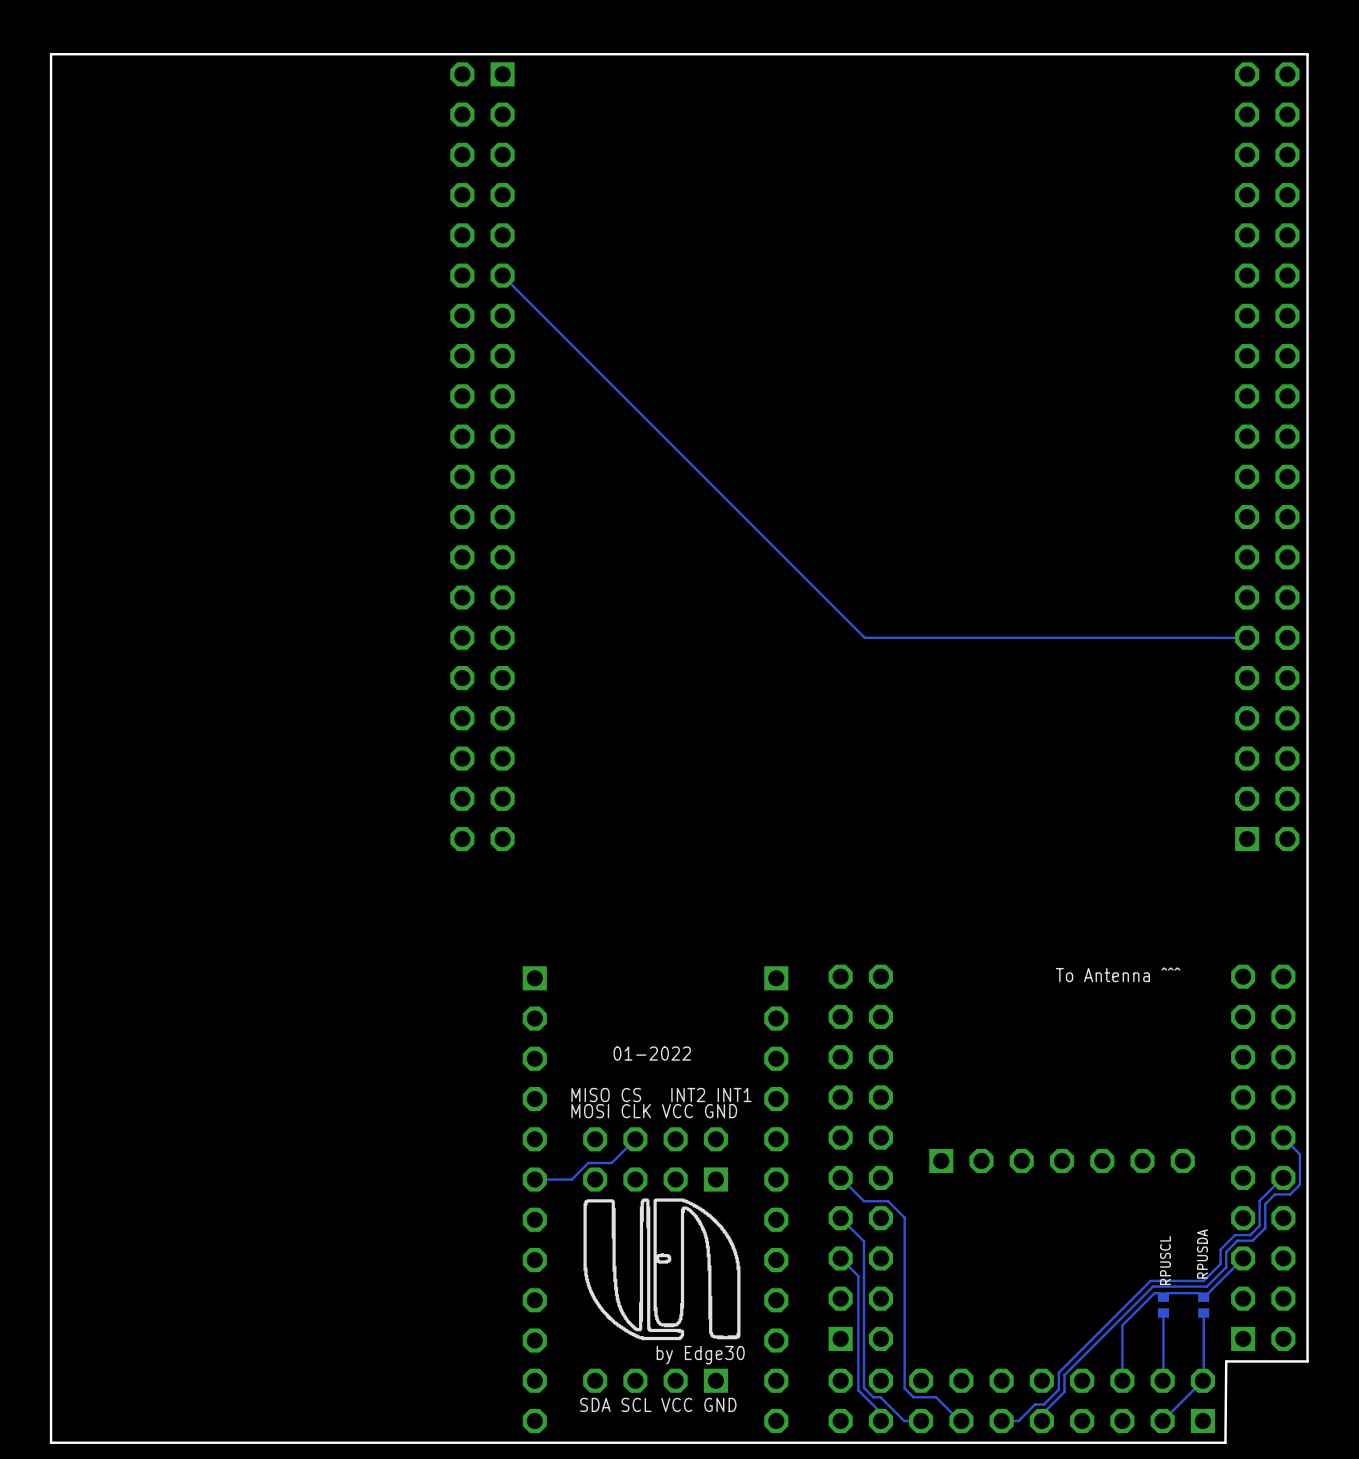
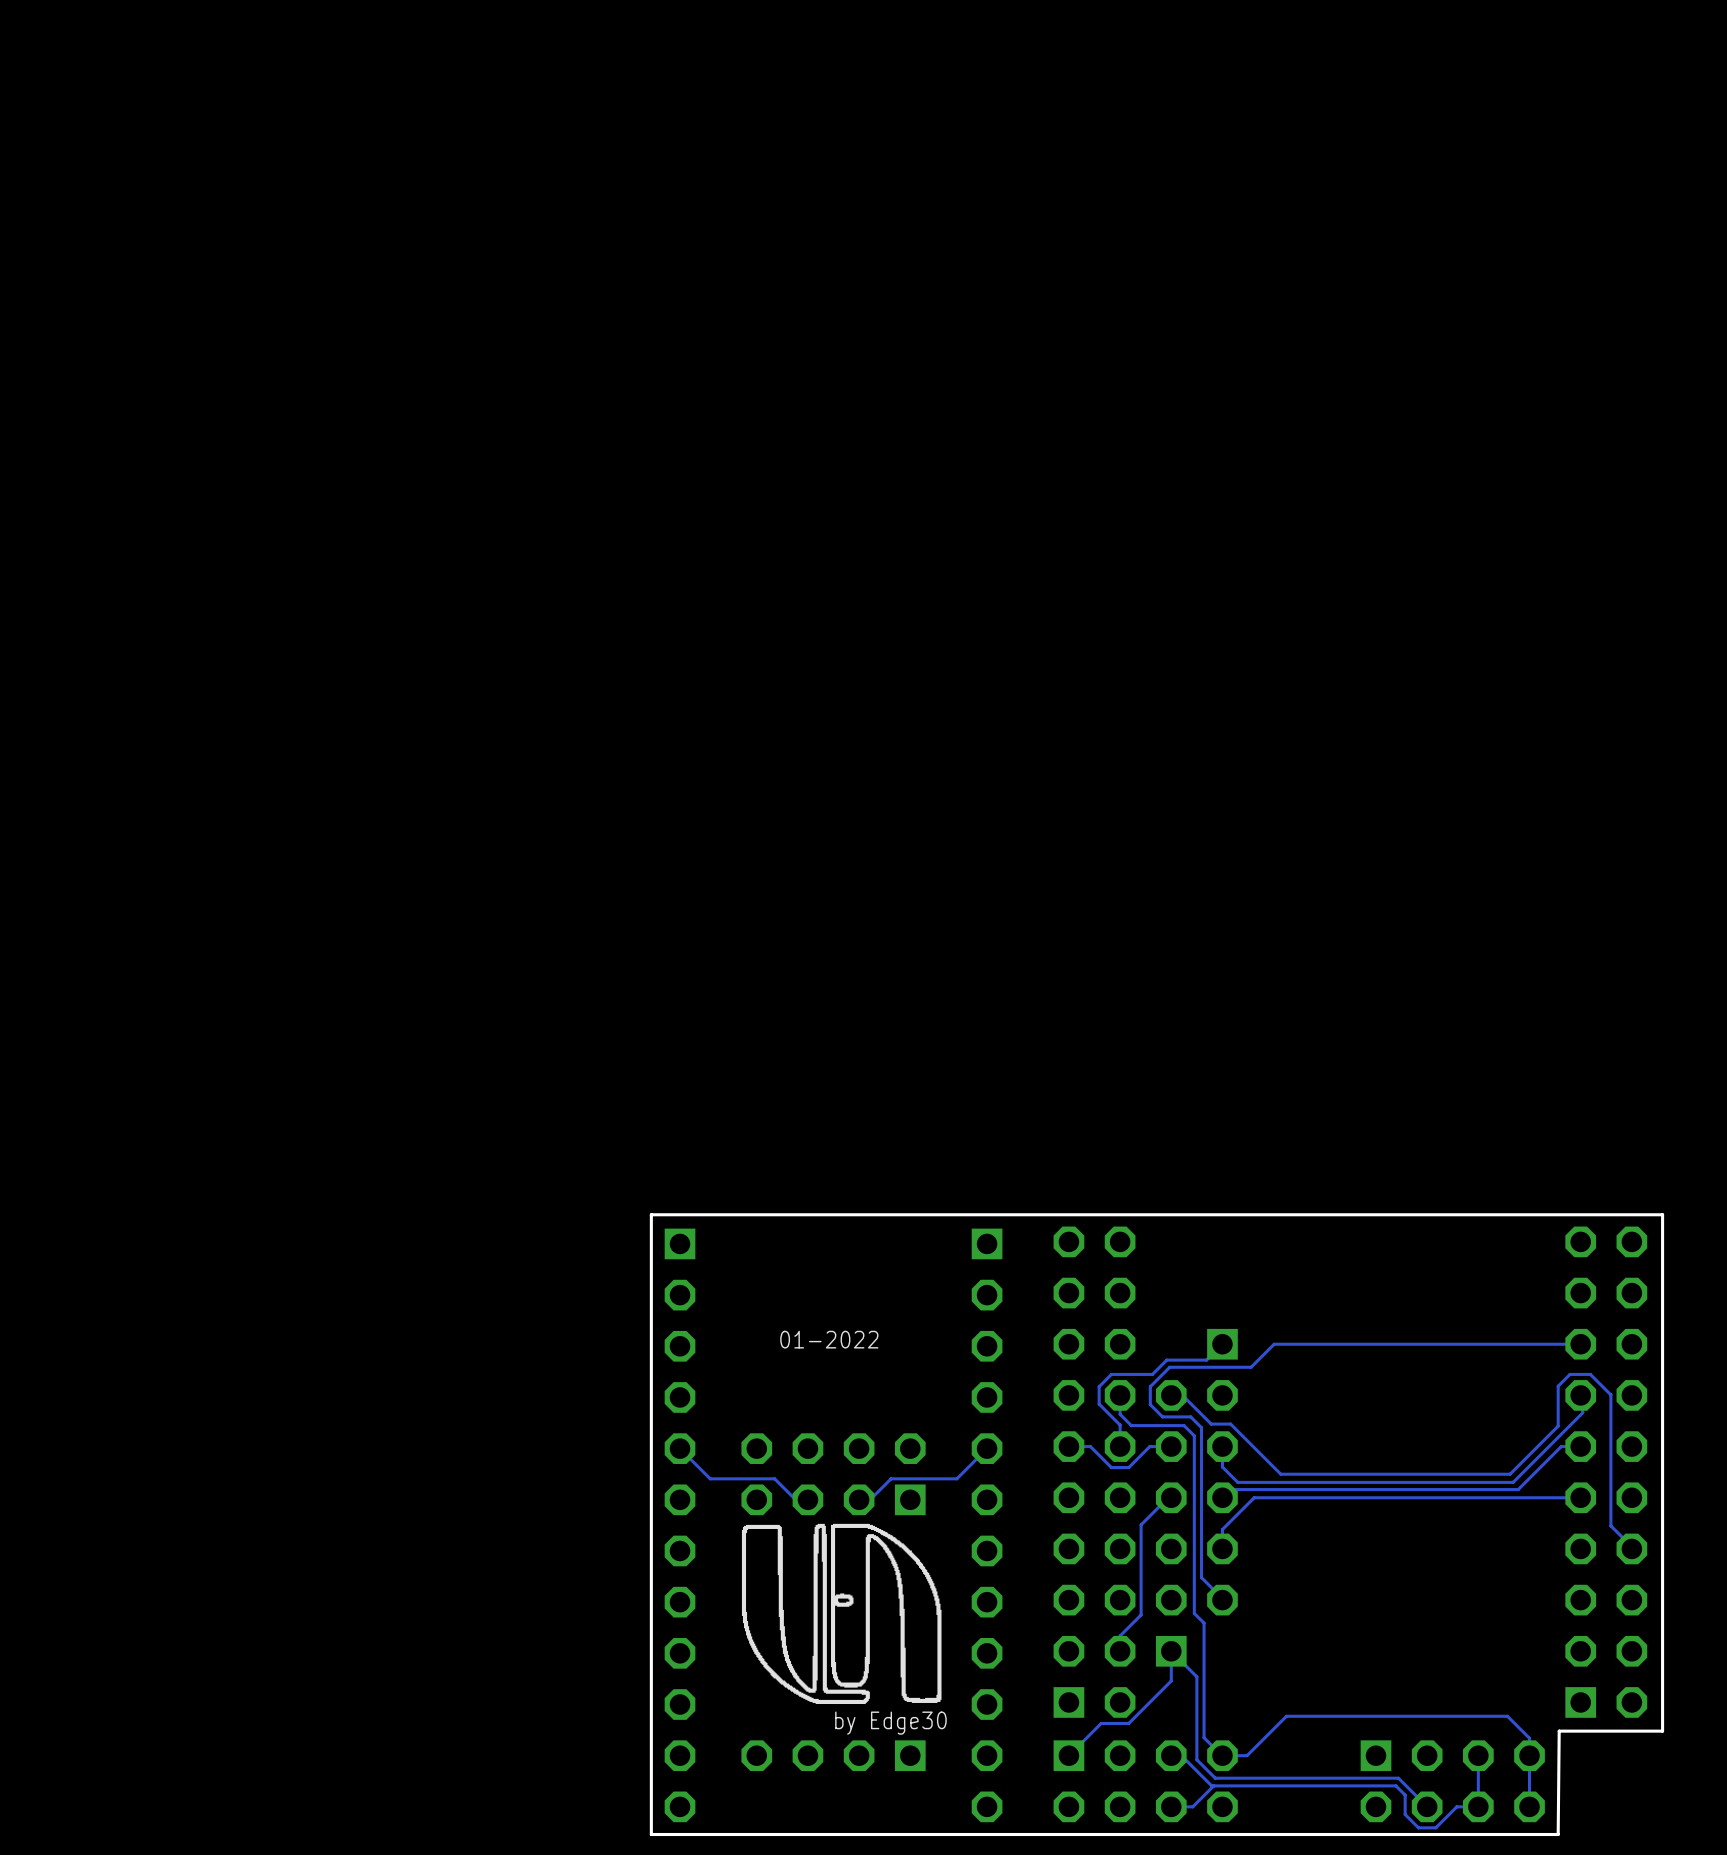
track: (502, 275) (864, 637) (1247, 637) -> none
part: (482, 456) -> none
part: (1267, 456) -> none
board edge: (1307, 955) (1307, 54) (51, 54) (51, 1442) (512, 1442) -> (1662, 1214) (651, 1214) (651, 1834)
text: To Antenna ^^^ (1118, 974) -> none
track: none -> (1222, 1344) (1206, 1360) (1166, 1360) (1152, 1374) (1111, 1374) (1099, 1386) (1099, 1404) (1120, 1425) (1120, 1446)
track: none -> (1580, 1344) (1274, 1344) (1251, 1367) (1169, 1367) (1150, 1386) (1150, 1404) (1162, 1416) (1190, 1416) (1201, 1427) (1201, 1577) (1222, 1600)
text: MISO CS INT2 INT1 (661, 1095) -> none
track: none -> (1120, 1395) (1120, 1414) (1131, 1425) (1184, 1425) (1194, 1435) (1194, 1613) (1204, 1623) (1204, 1737) (1221, 1755) (1247, 1755) (1286, 1716) (1507, 1716) (1529, 1738) (1529, 1755) (1527, 1755) (1529, 1757) (1529, 1806)
track: none -> (1171, 1395) (1182, 1395) (1211, 1424) (1230, 1424) (1280, 1474) (1510, 1474) (1558, 1426) (1558, 1386) (1569, 1374) (1590, 1374) (1610, 1394) (1610, 1525) (1631, 1548)
track: none -> (1580, 1395) (1582, 1397) (1582, 1412) (1513, 1482) (1237, 1482) (1222, 1467) (1222, 1446)
text: MOSI CLK VCC GND (654, 1111) -> none
track: none -> (1171, 1446) (1149, 1446) (1128, 1467) (1111, 1467) (1090, 1446) (1068, 1446)
track: none -> (1580, 1446) (1561, 1446) (1518, 1489) (1230, 1489) (1222, 1497)
track: (1283, 1137) (1299, 1154) (1299, 1184) (1290, 1194) (1274, 1194) (1265, 1204) (1265, 1228) (1252, 1240) (1237, 1240) (1226, 1251) (1226, 1267) (1206, 1286) (1152, 1286) (1064, 1375) (1064, 1391) (1041, 1414) (1041, 1421) -> none
track: (635, 1139) (611, 1163) (609, 1163) -> (807, 1499) (795, 1499) (774, 1478)
track: none -> (987, 1448) (956, 1478) (891, 1478) (870, 1499) (859, 1499)
part: none -> (1222, 1472)
part: (1062, 1161) -> none
track: (588, 1163) (571, 1179) (534, 1179) -> (748, 1478) (710, 1478) (680, 1448)
track: (840, 1177) (864, 1201) (888, 1201) (904, 1217) (904, 1388) (913, 1397) (936, 1397) (961, 1421) -> none
track: none -> (1171, 1497) (1168, 1497) (1141, 1524) (1141, 1614) (1120, 1635) (1120, 1651)
track: none -> (1580, 1497) (1254, 1497) (1222, 1529) (1222, 1548)
track: (1283, 1177) (1259, 1200) (1259, 1225) (1250, 1235) (1235, 1235) (1220, 1249) (1220, 1264) (1203, 1280) (1150, 1280) (1058, 1372) (1058, 1389) (1043, 1404) -> (1478, 1755) (1478, 1806) (1456, 1806) (1435, 1827) (1418, 1827) (1405, 1814) (1405, 1795) (1395, 1785) (1327, 1785)
part: none -> (1171, 1523)
track: (840, 1218) (864, 1241) (864, 1387) (873, 1397) (880, 1397) (904, 1421) (921, 1421) -> (1213, 1785) (1192, 1806) (1171, 1806)
track: (840, 1258) (858, 1276) (858, 1390) (880, 1412) (880, 1421) -> none
track: (1241, 1258) (1243, 1258) (1204, 1297) (1199, 1293) (1167, 1293) (1163, 1297) (1159, 1293) (1154, 1293) (1122, 1325) (1122, 1380) -> none
RPUSCL: (1163, 1305) -> none
RPUSDA: (1203, 1305) -> none
track: (1163, 1313) (1163, 1379) (1161, 1380) -> none
track: (1203, 1313) (1203, 1379) (1162, 1421) -> none
track: none -> (1068, 1755) (1101, 1723) (1128, 1723) (1171, 1680) (1171, 1651) (1196, 1676) (1196, 1759) (1215, 1778) (1398, 1778) (1427, 1806)
part: none -> (1145, 1781)
part: (1021, 1400) -> none
part: none -> (1452, 1781)
text: SDA SCL VCC GND (658, 1404) -> none
track: (1035, 1404) (1018, 1421) (1001, 1421) -> (1316, 1785) (1211, 1785) (1181, 1755) (1171, 1755)

